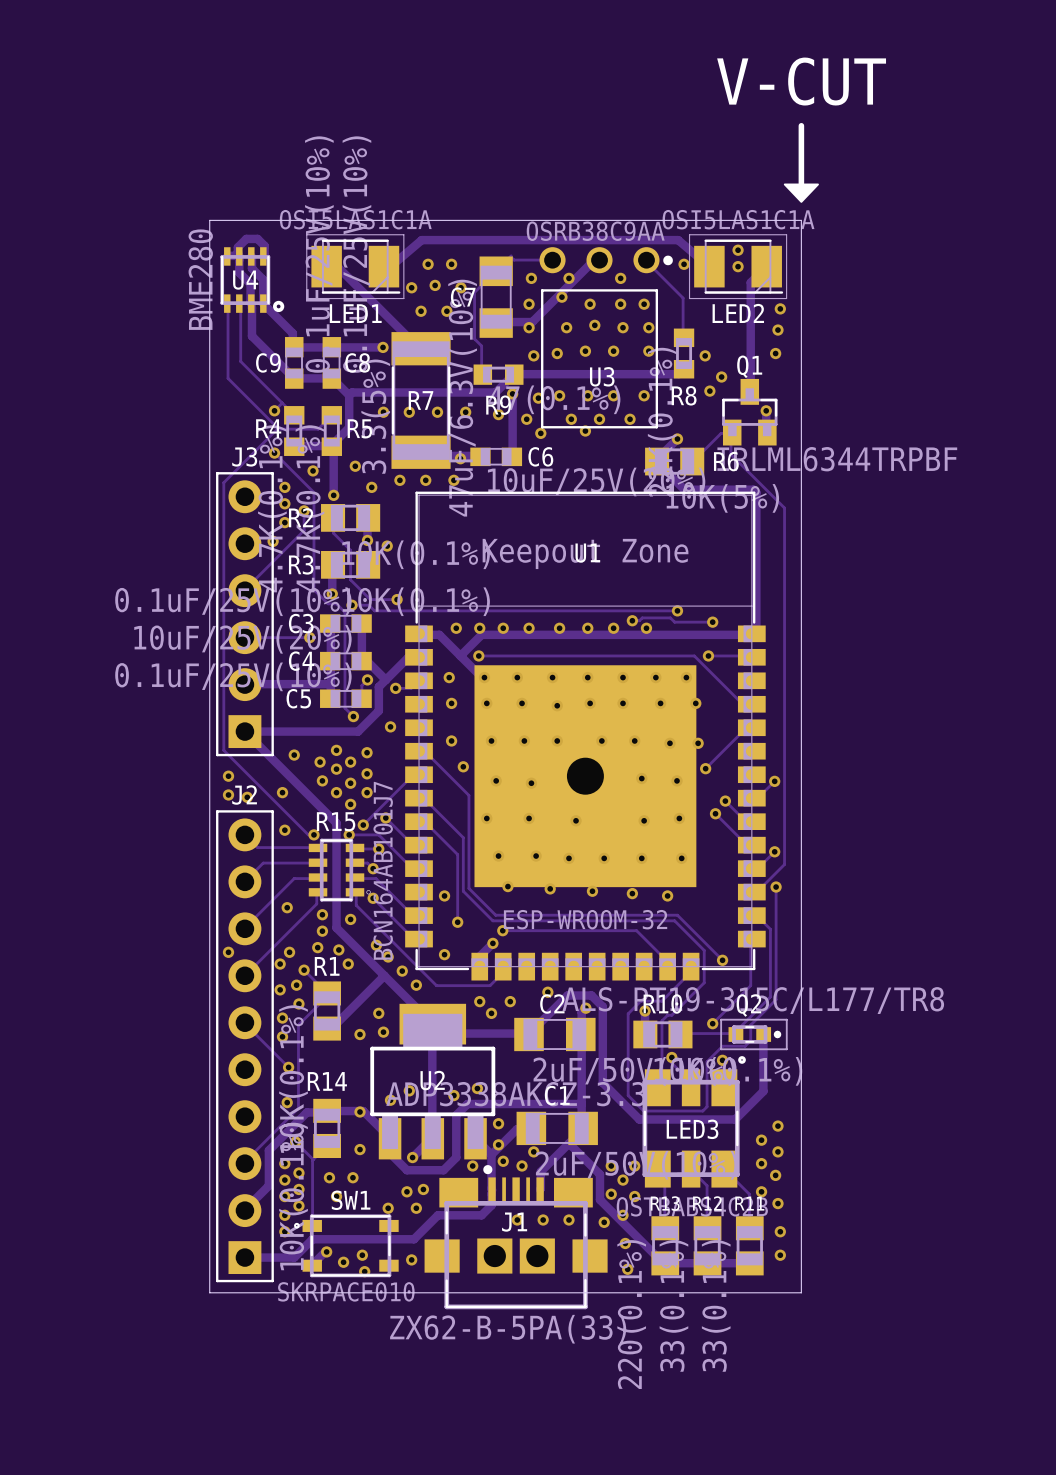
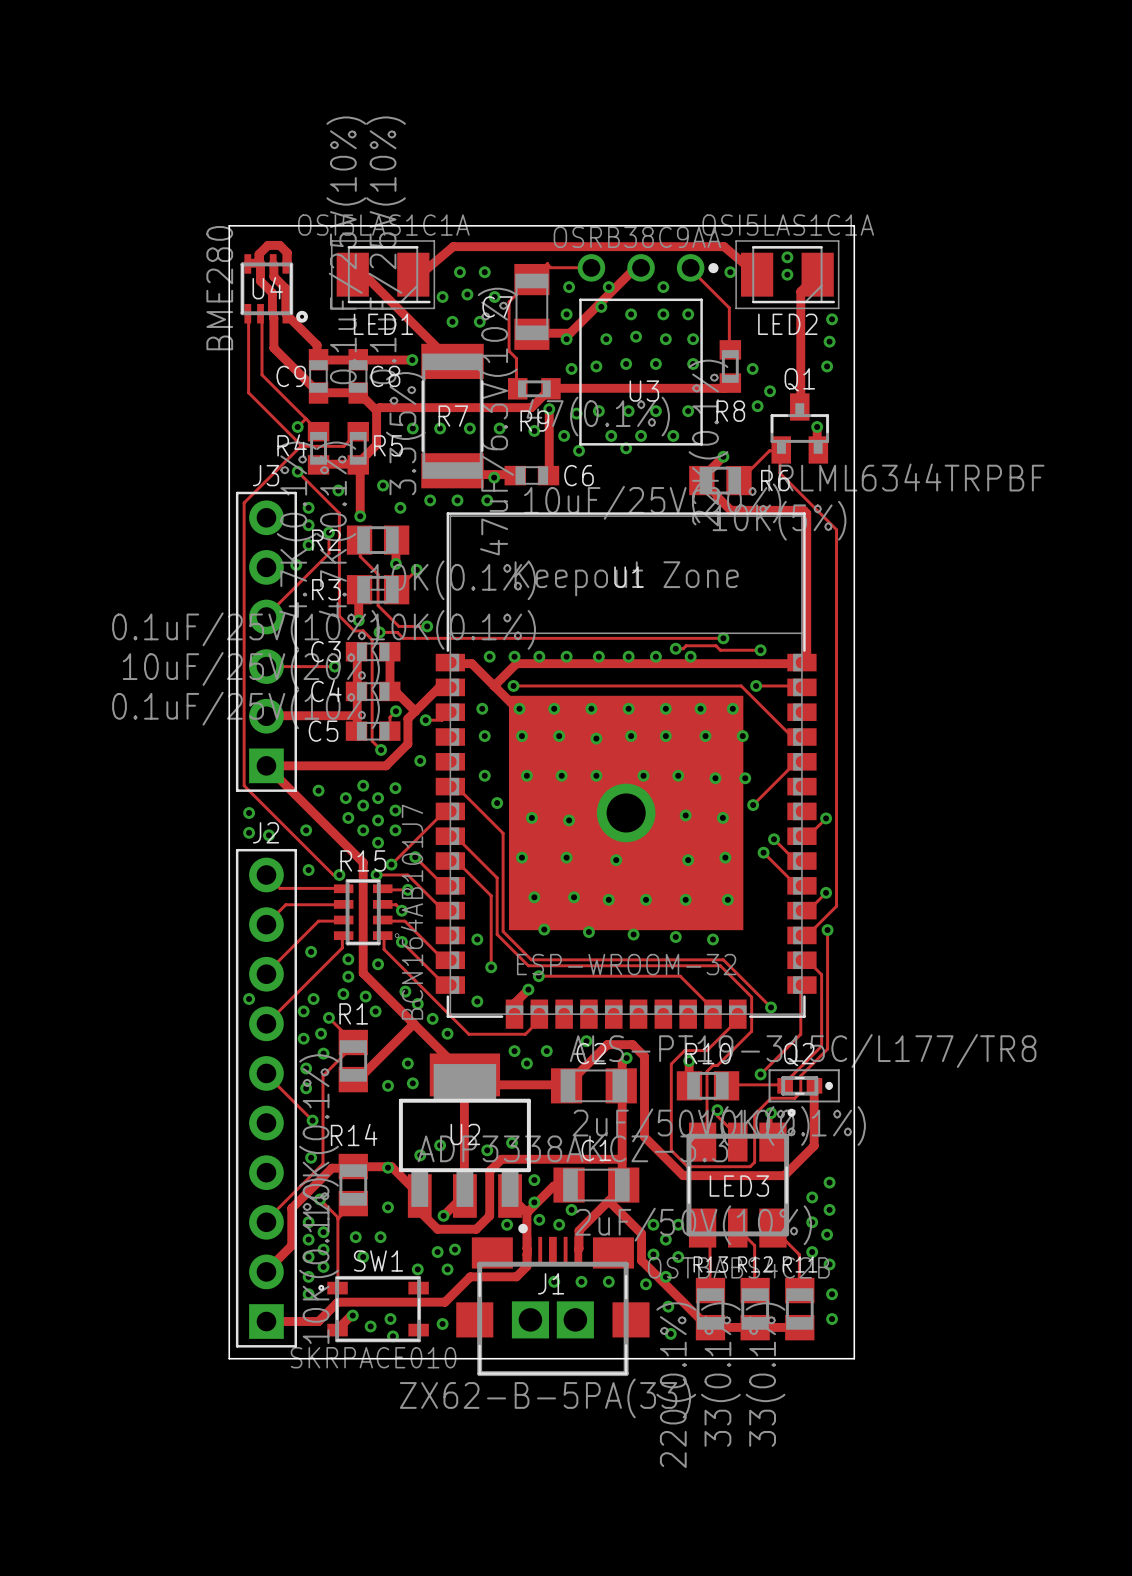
text: V-CUT (801, 81) -> none
line: (801, 125) (801, 191) -> none
drawing: [783, 183, 819, 203] -> none

